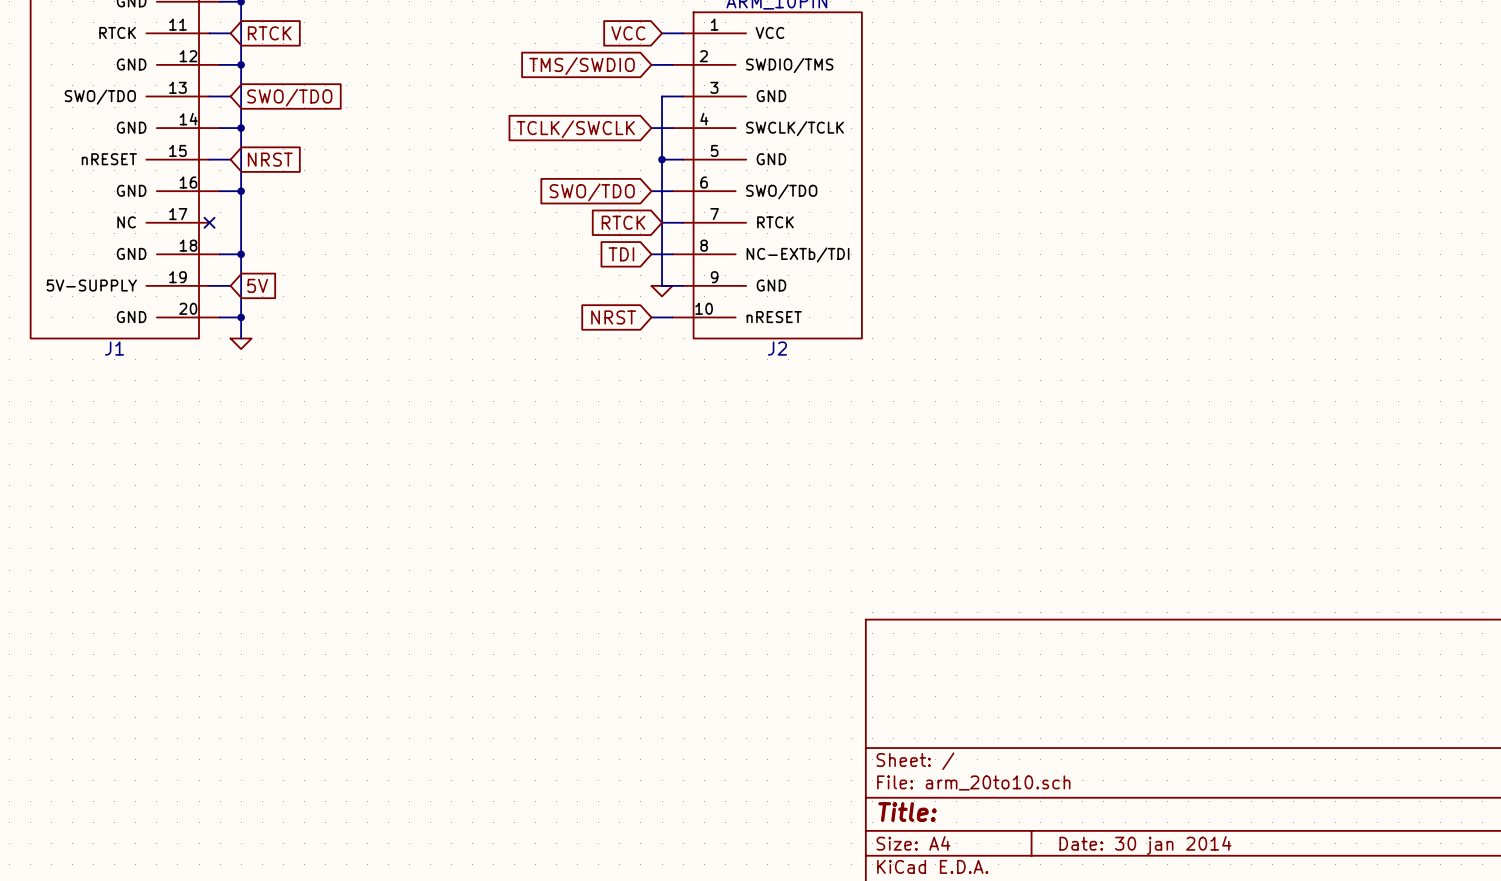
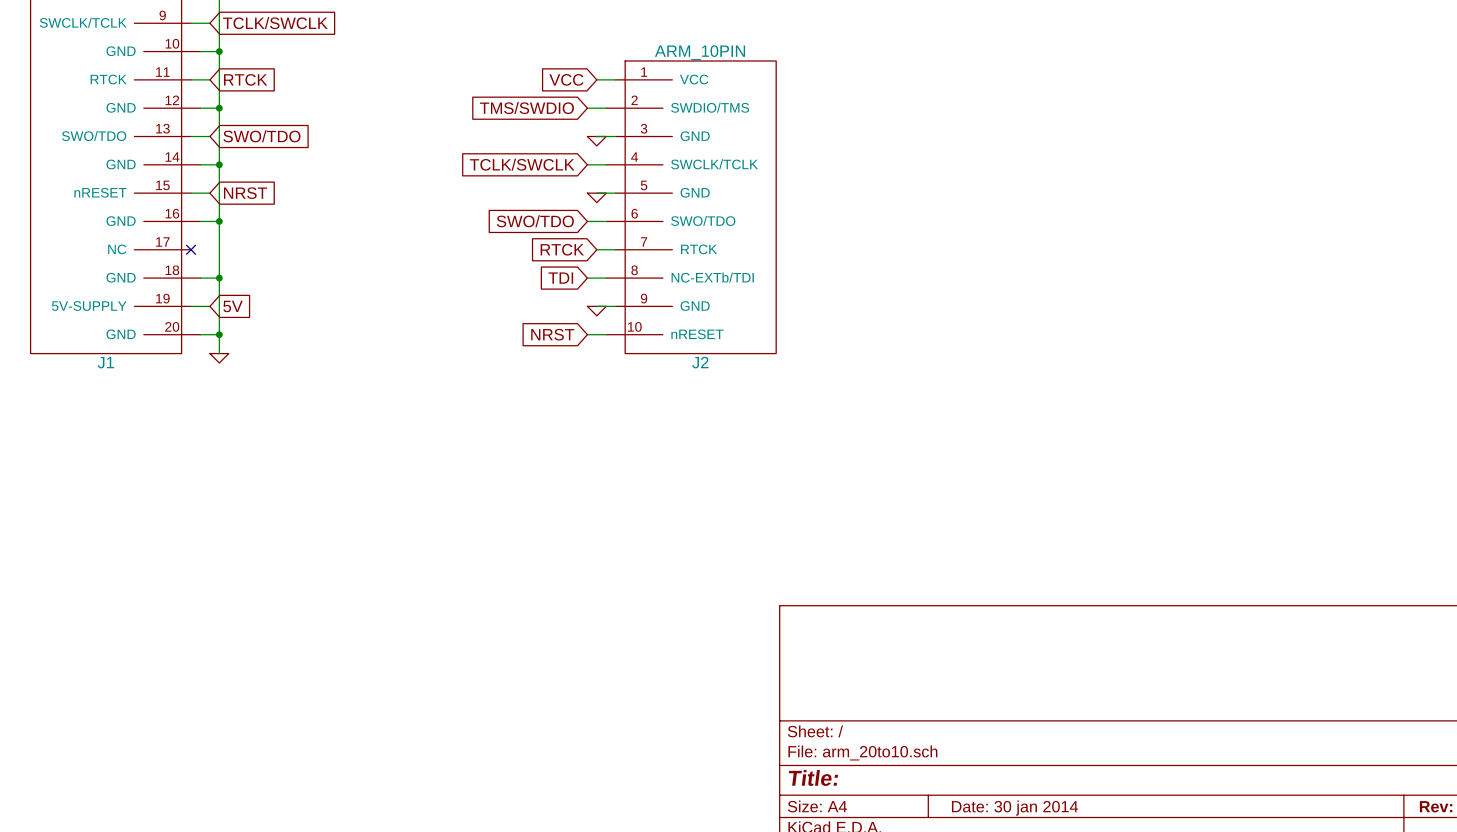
wire: (662, 96) (662, 285) -> none
power symbol: none -> (596, 141)
junction: (662, 159) -> none
power symbol: none -> (596, 197)

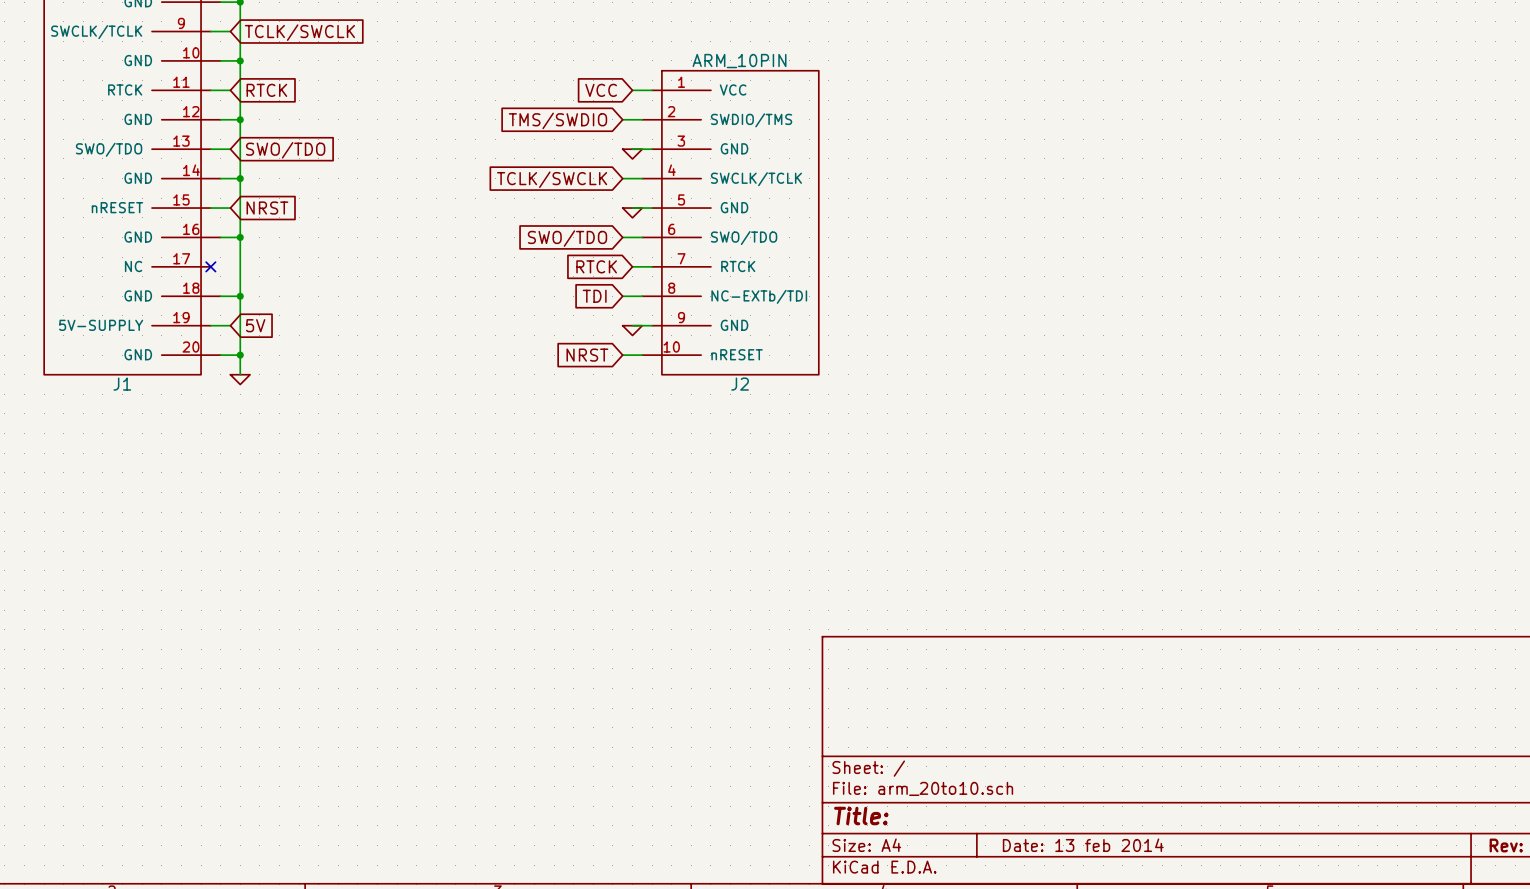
title block: Date: 30 jan 2014 (1014, 808) -> Date: 13 feb 2014 (1083, 845)

